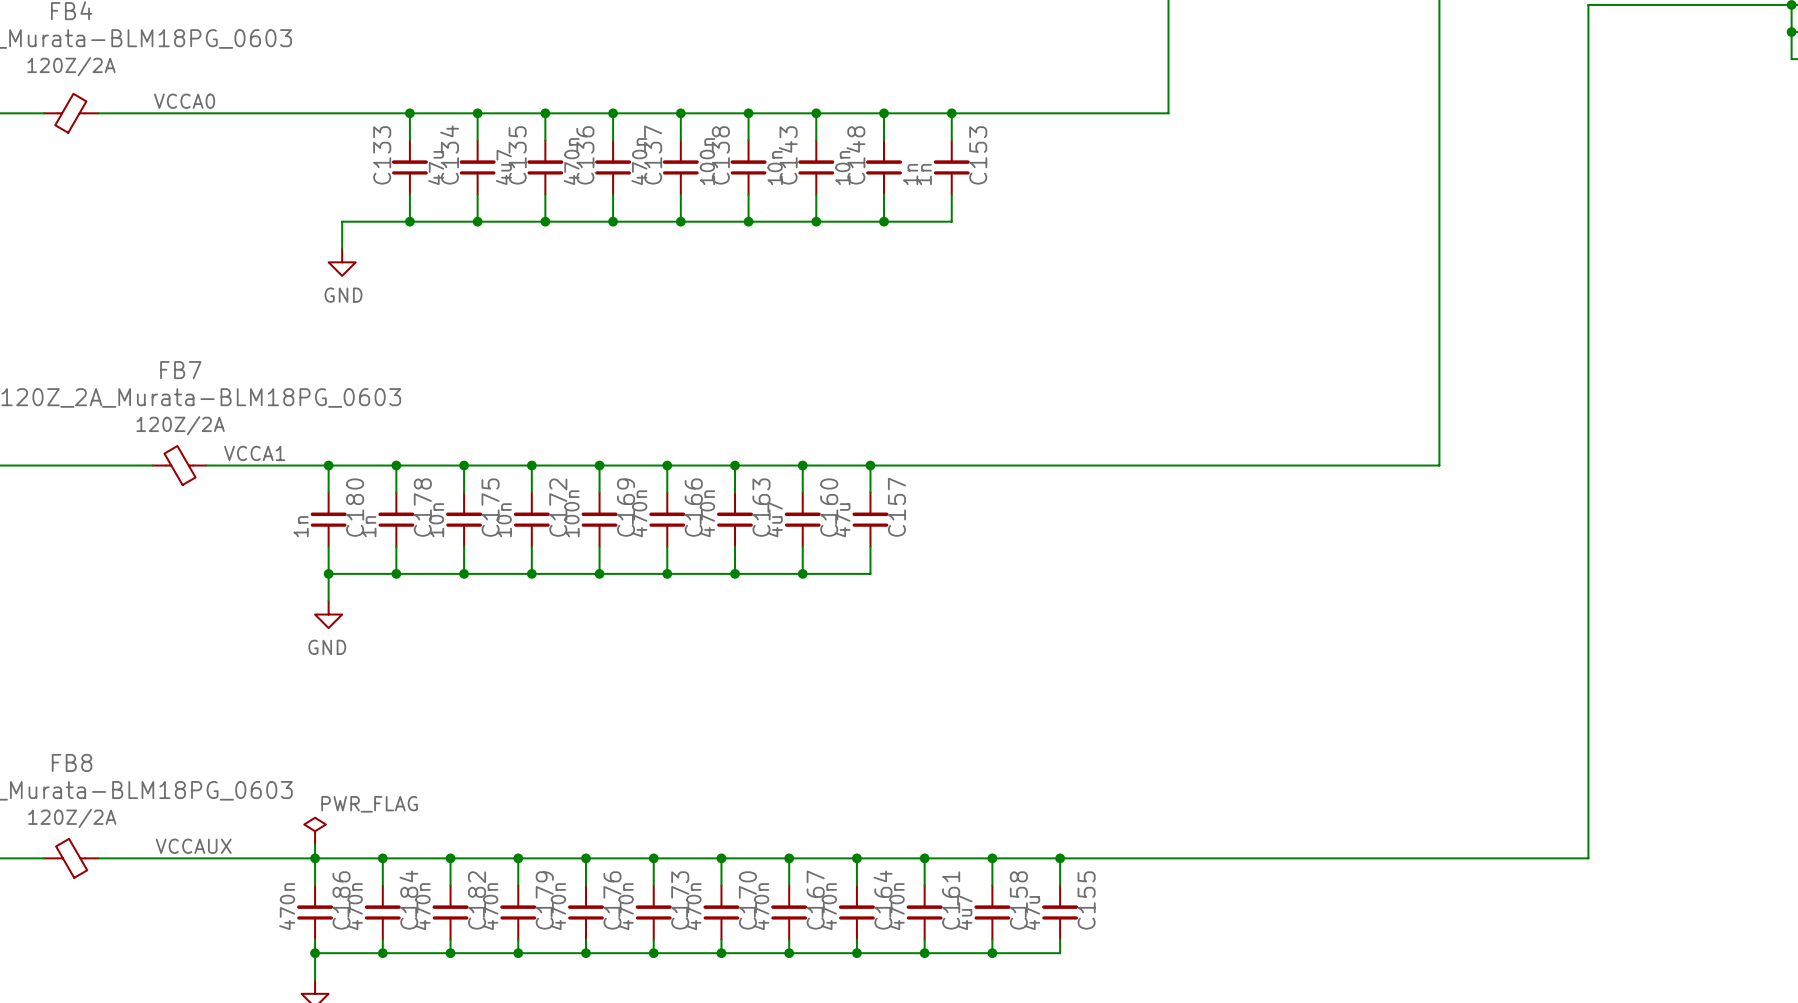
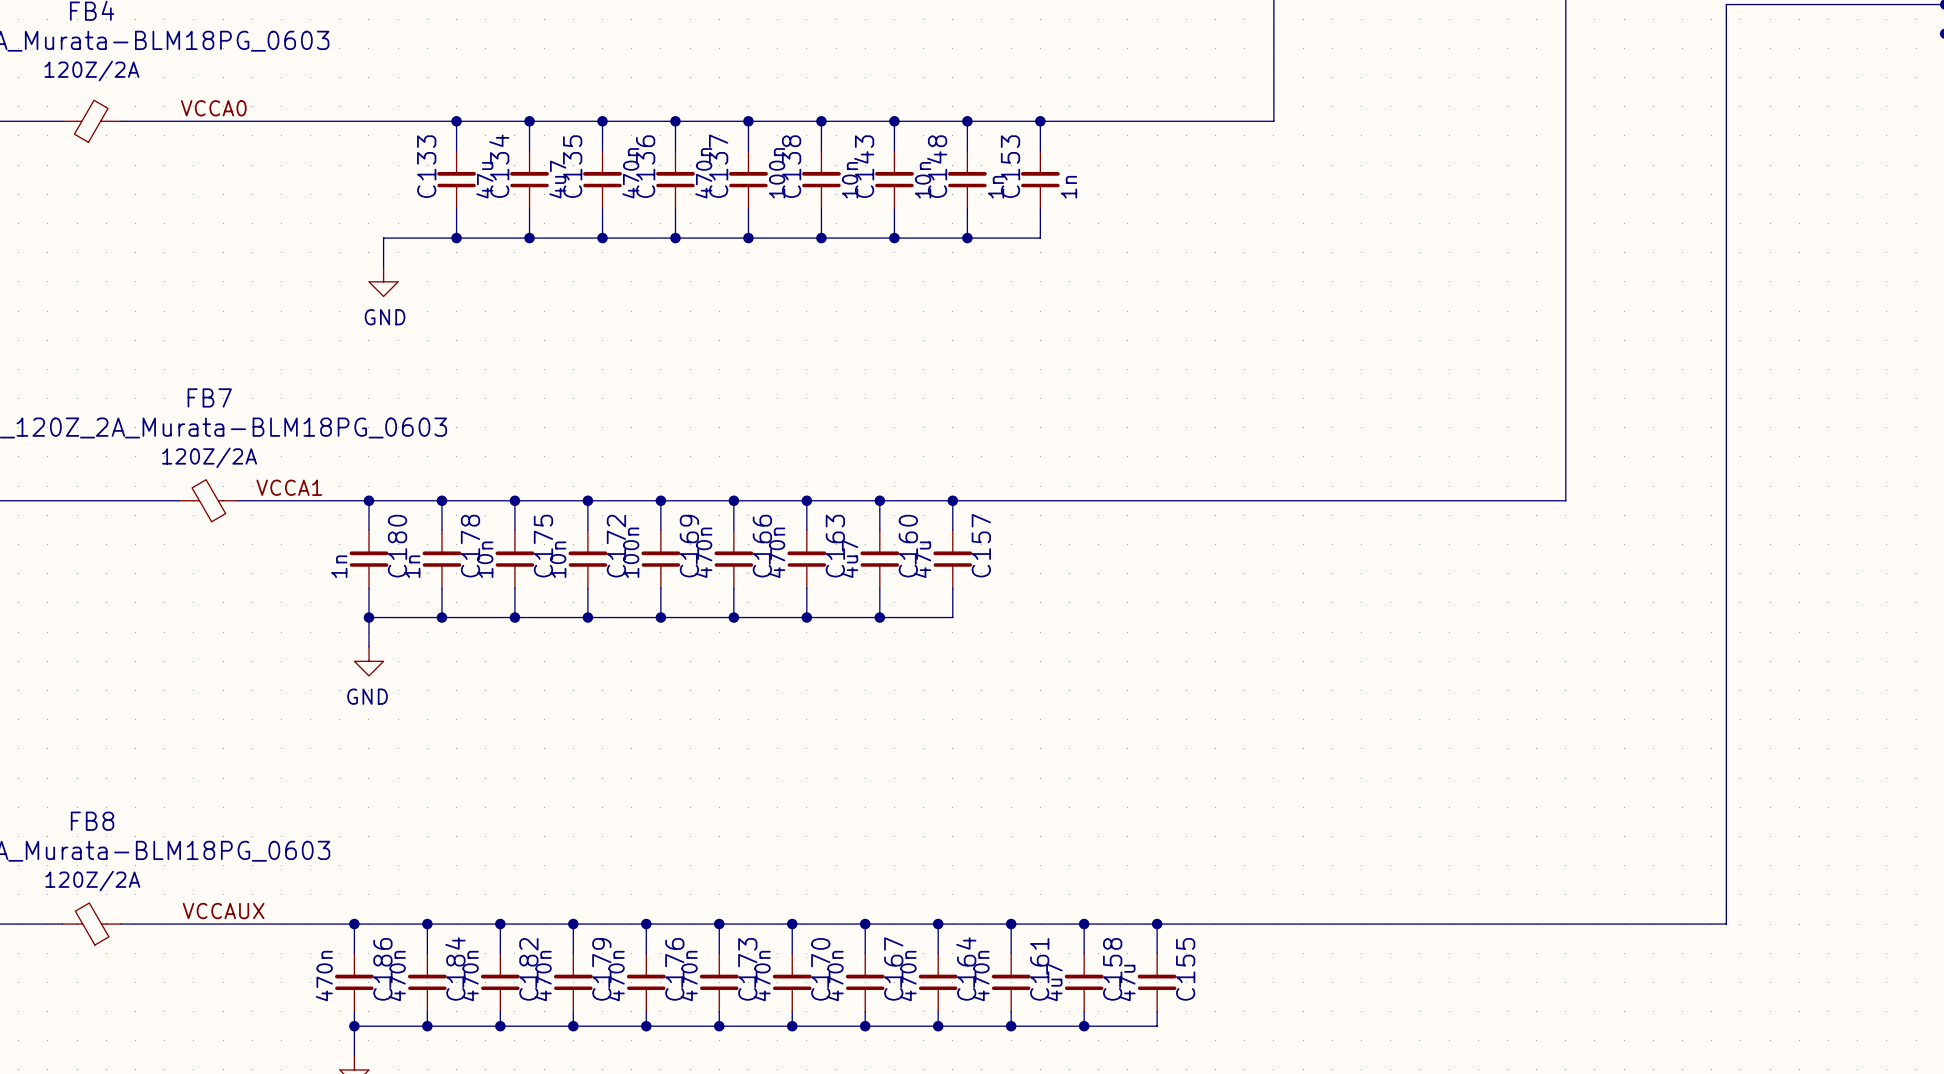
C153 name position: C153 (978, 155) -> C153 (1010, 166)
C153 text position: 1n (924, 174) -> 1n (1069, 187)
power symbol: PWR_FLAG (315, 831) -> none
wire: (315, 844) (315, 858) -> none

